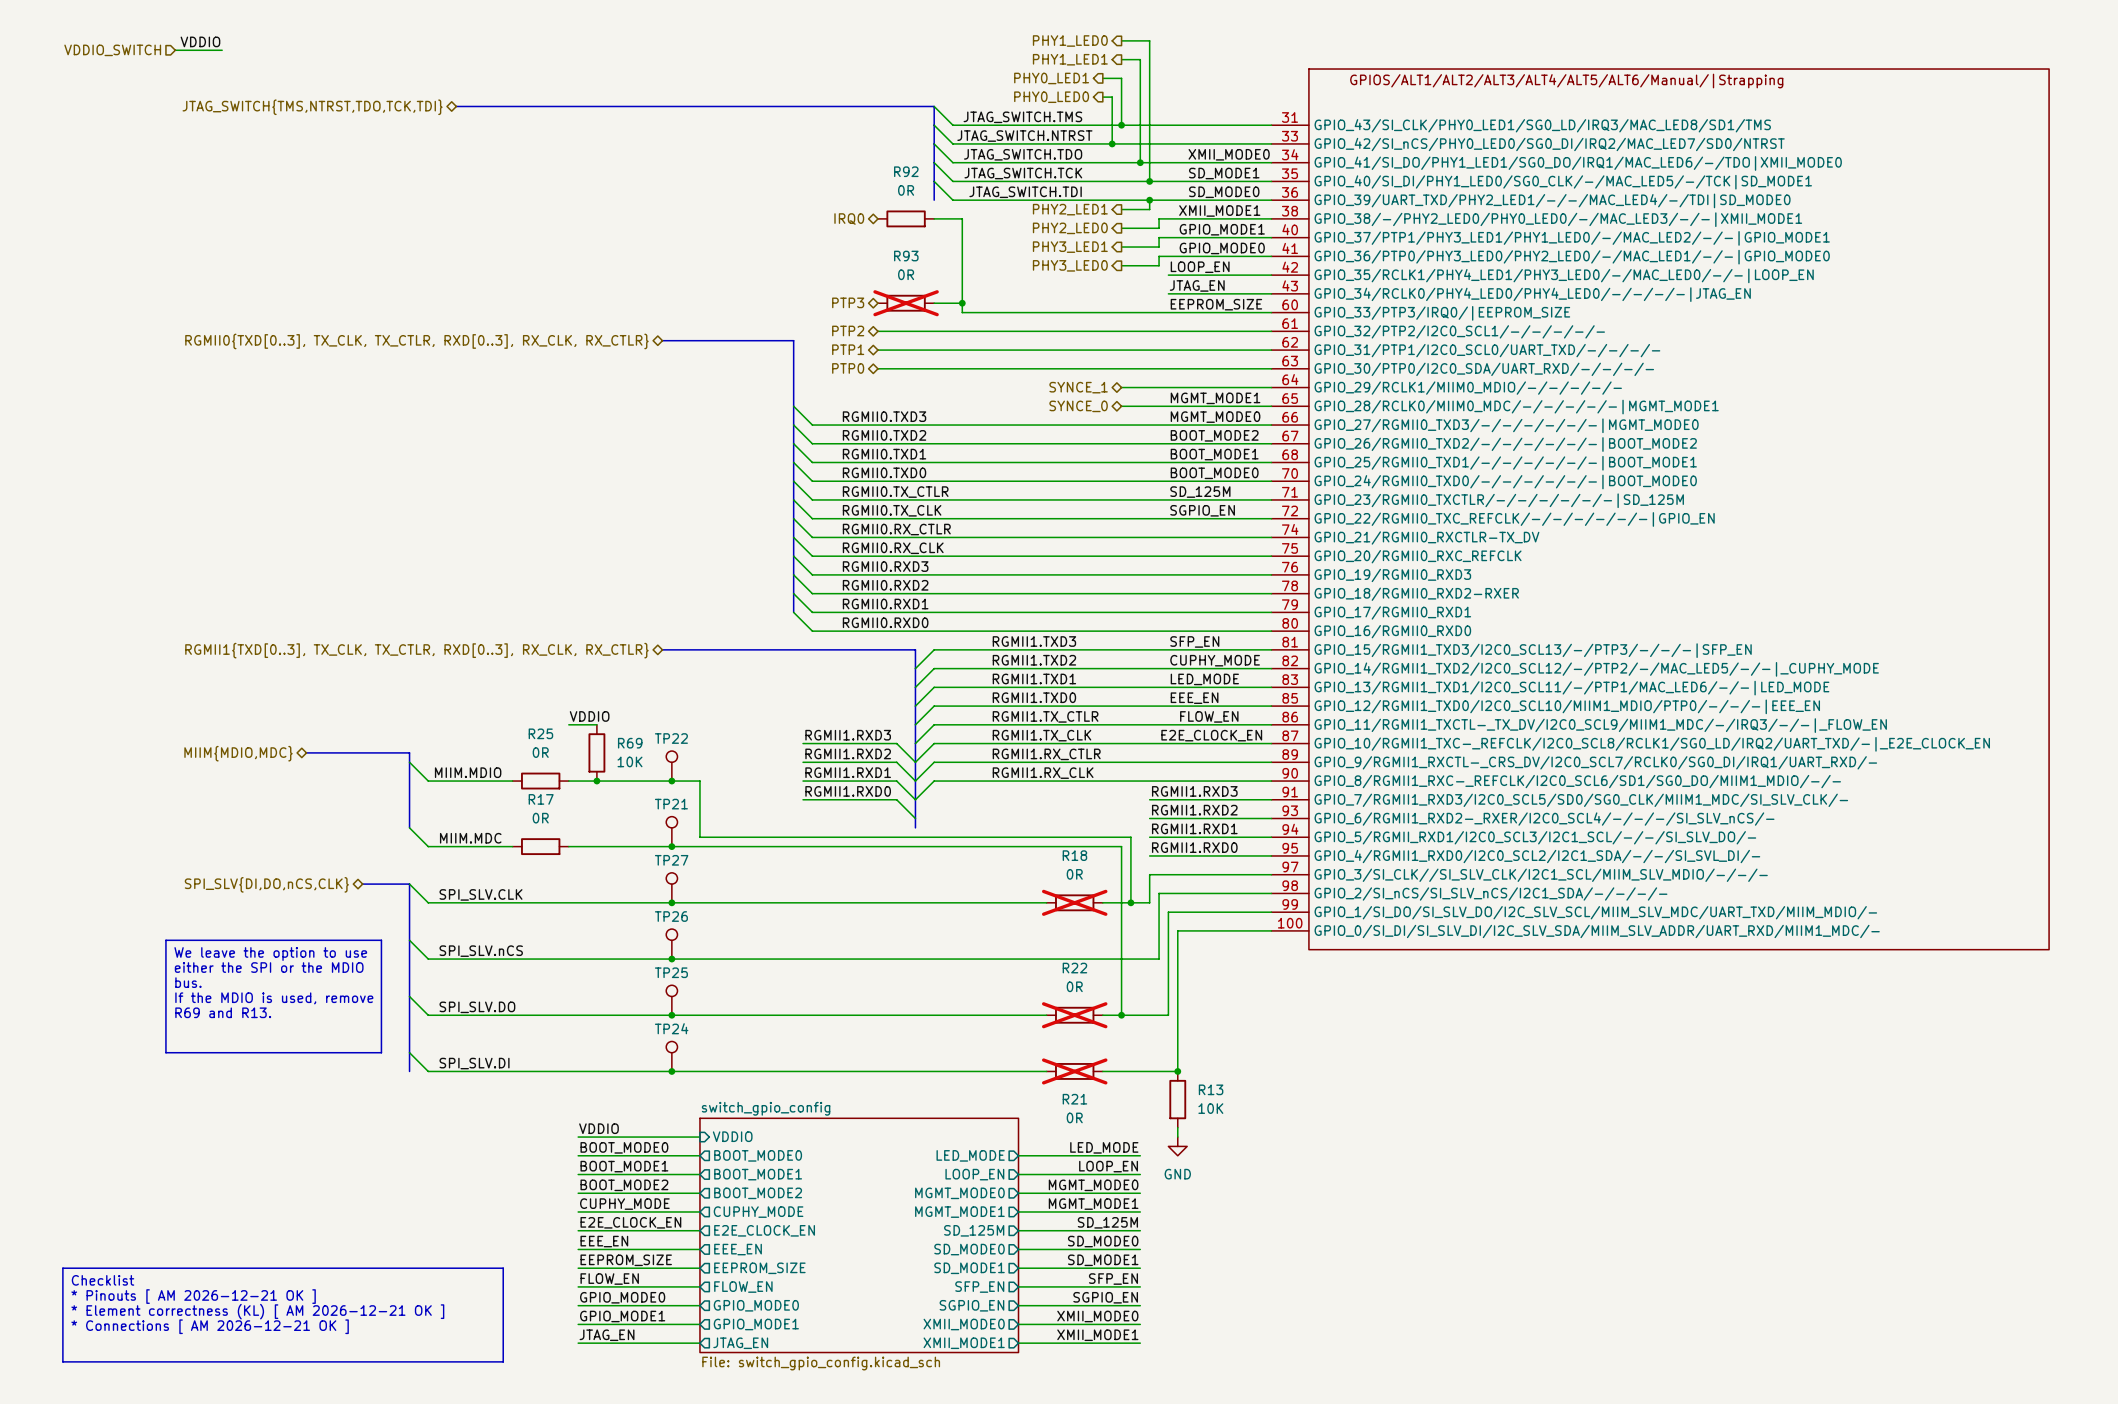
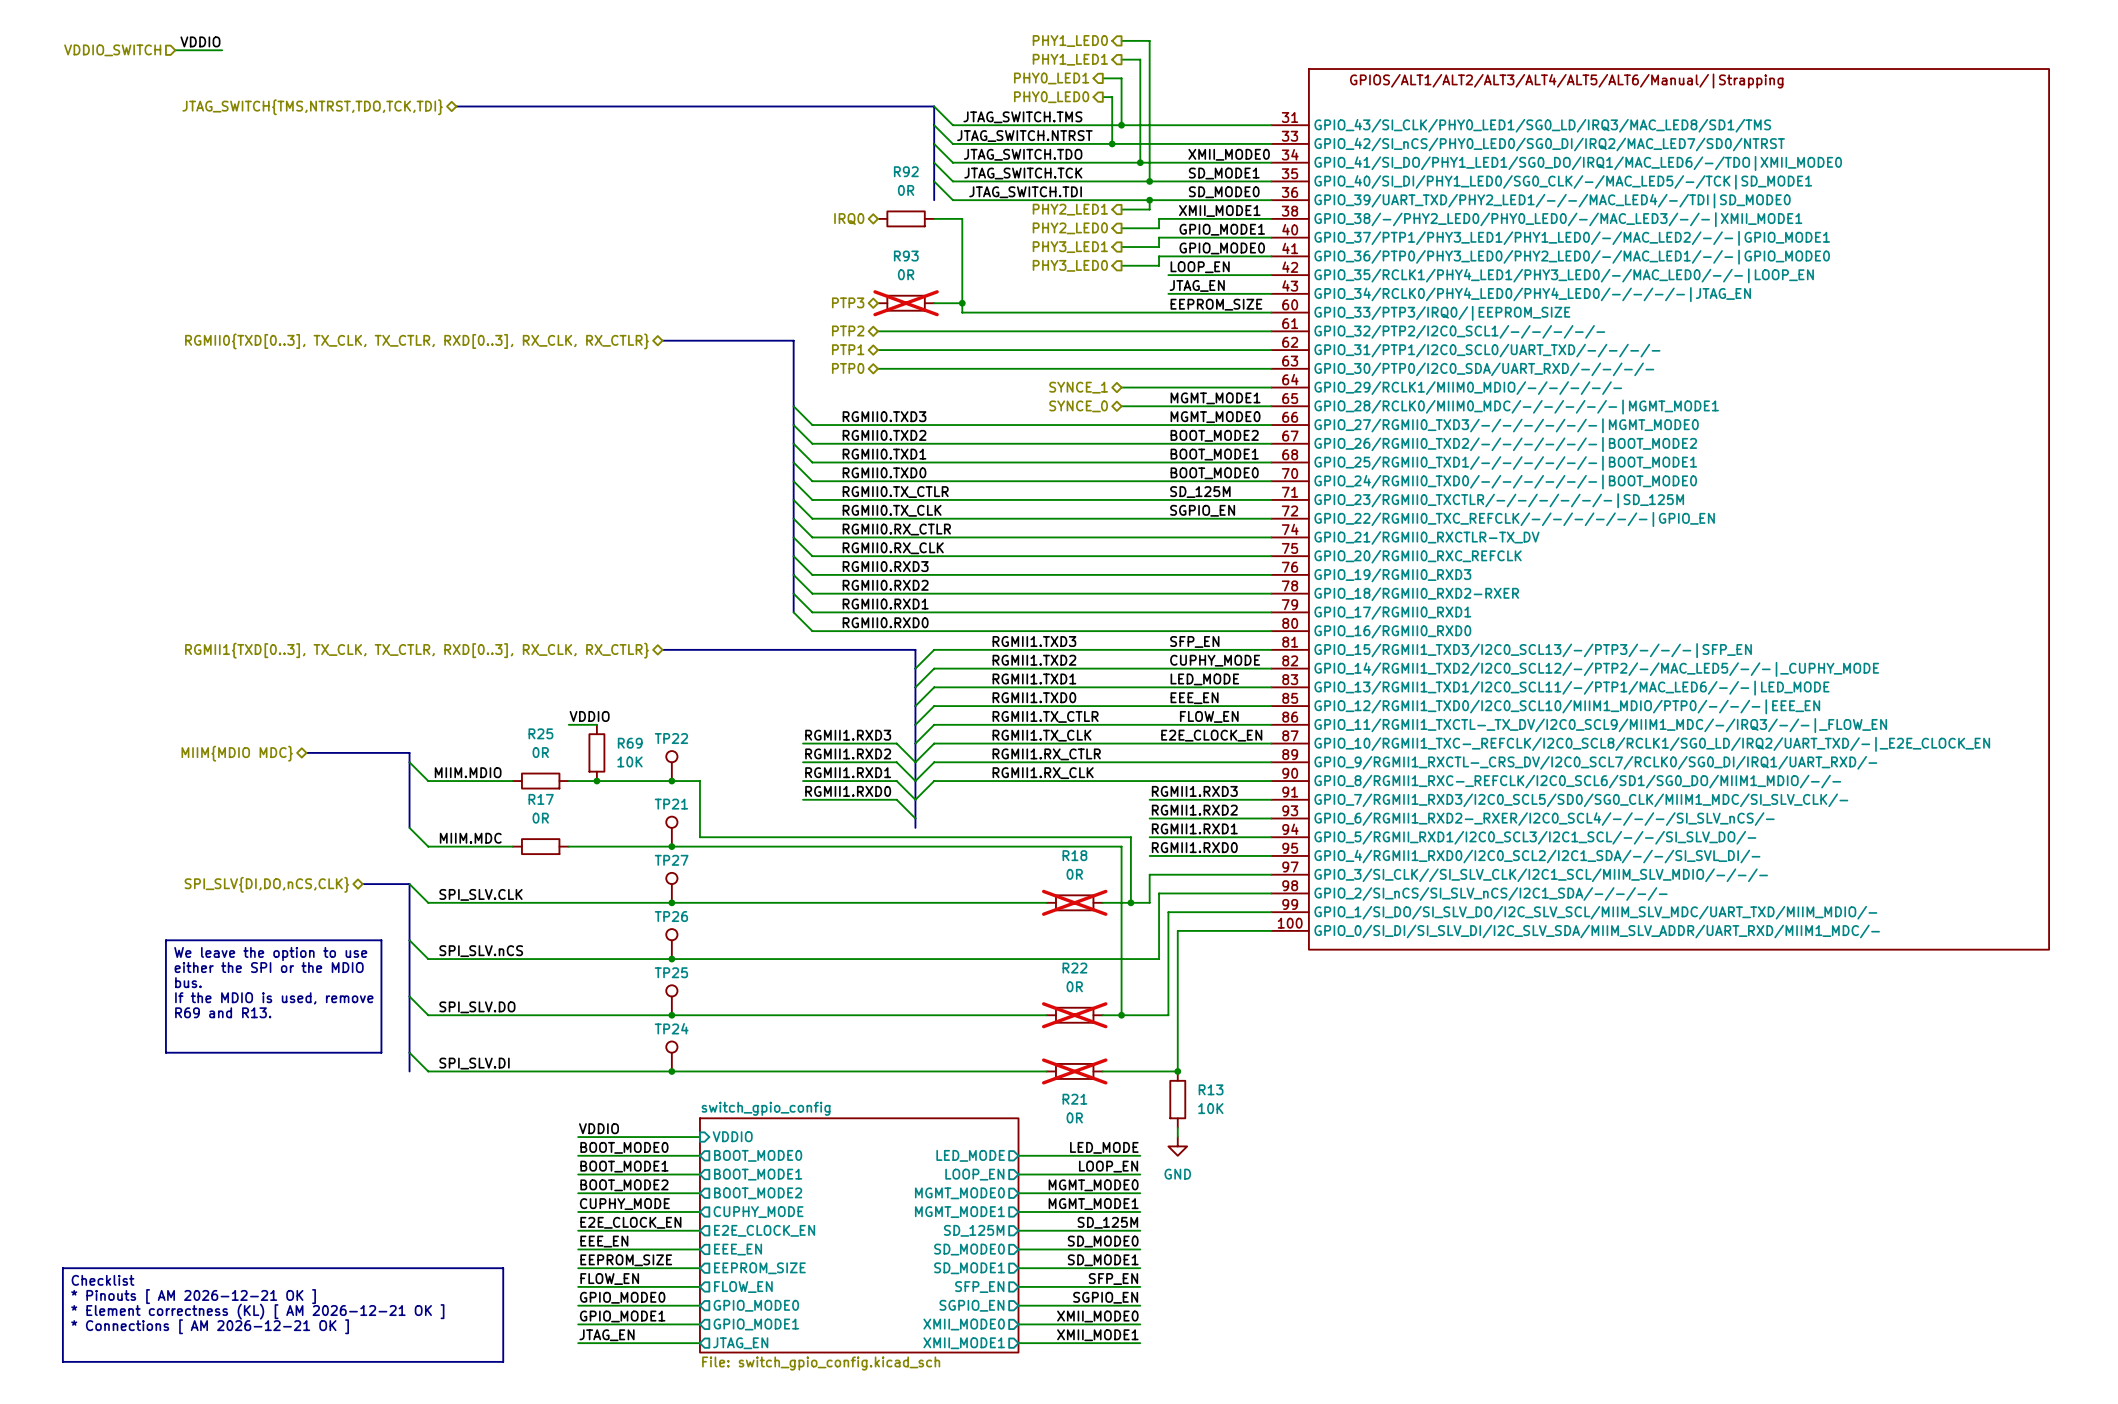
hierarchical label: MIIM{MDIO,MDC} (238, 753) -> MIIM{MDIO MDC} (237, 753)

